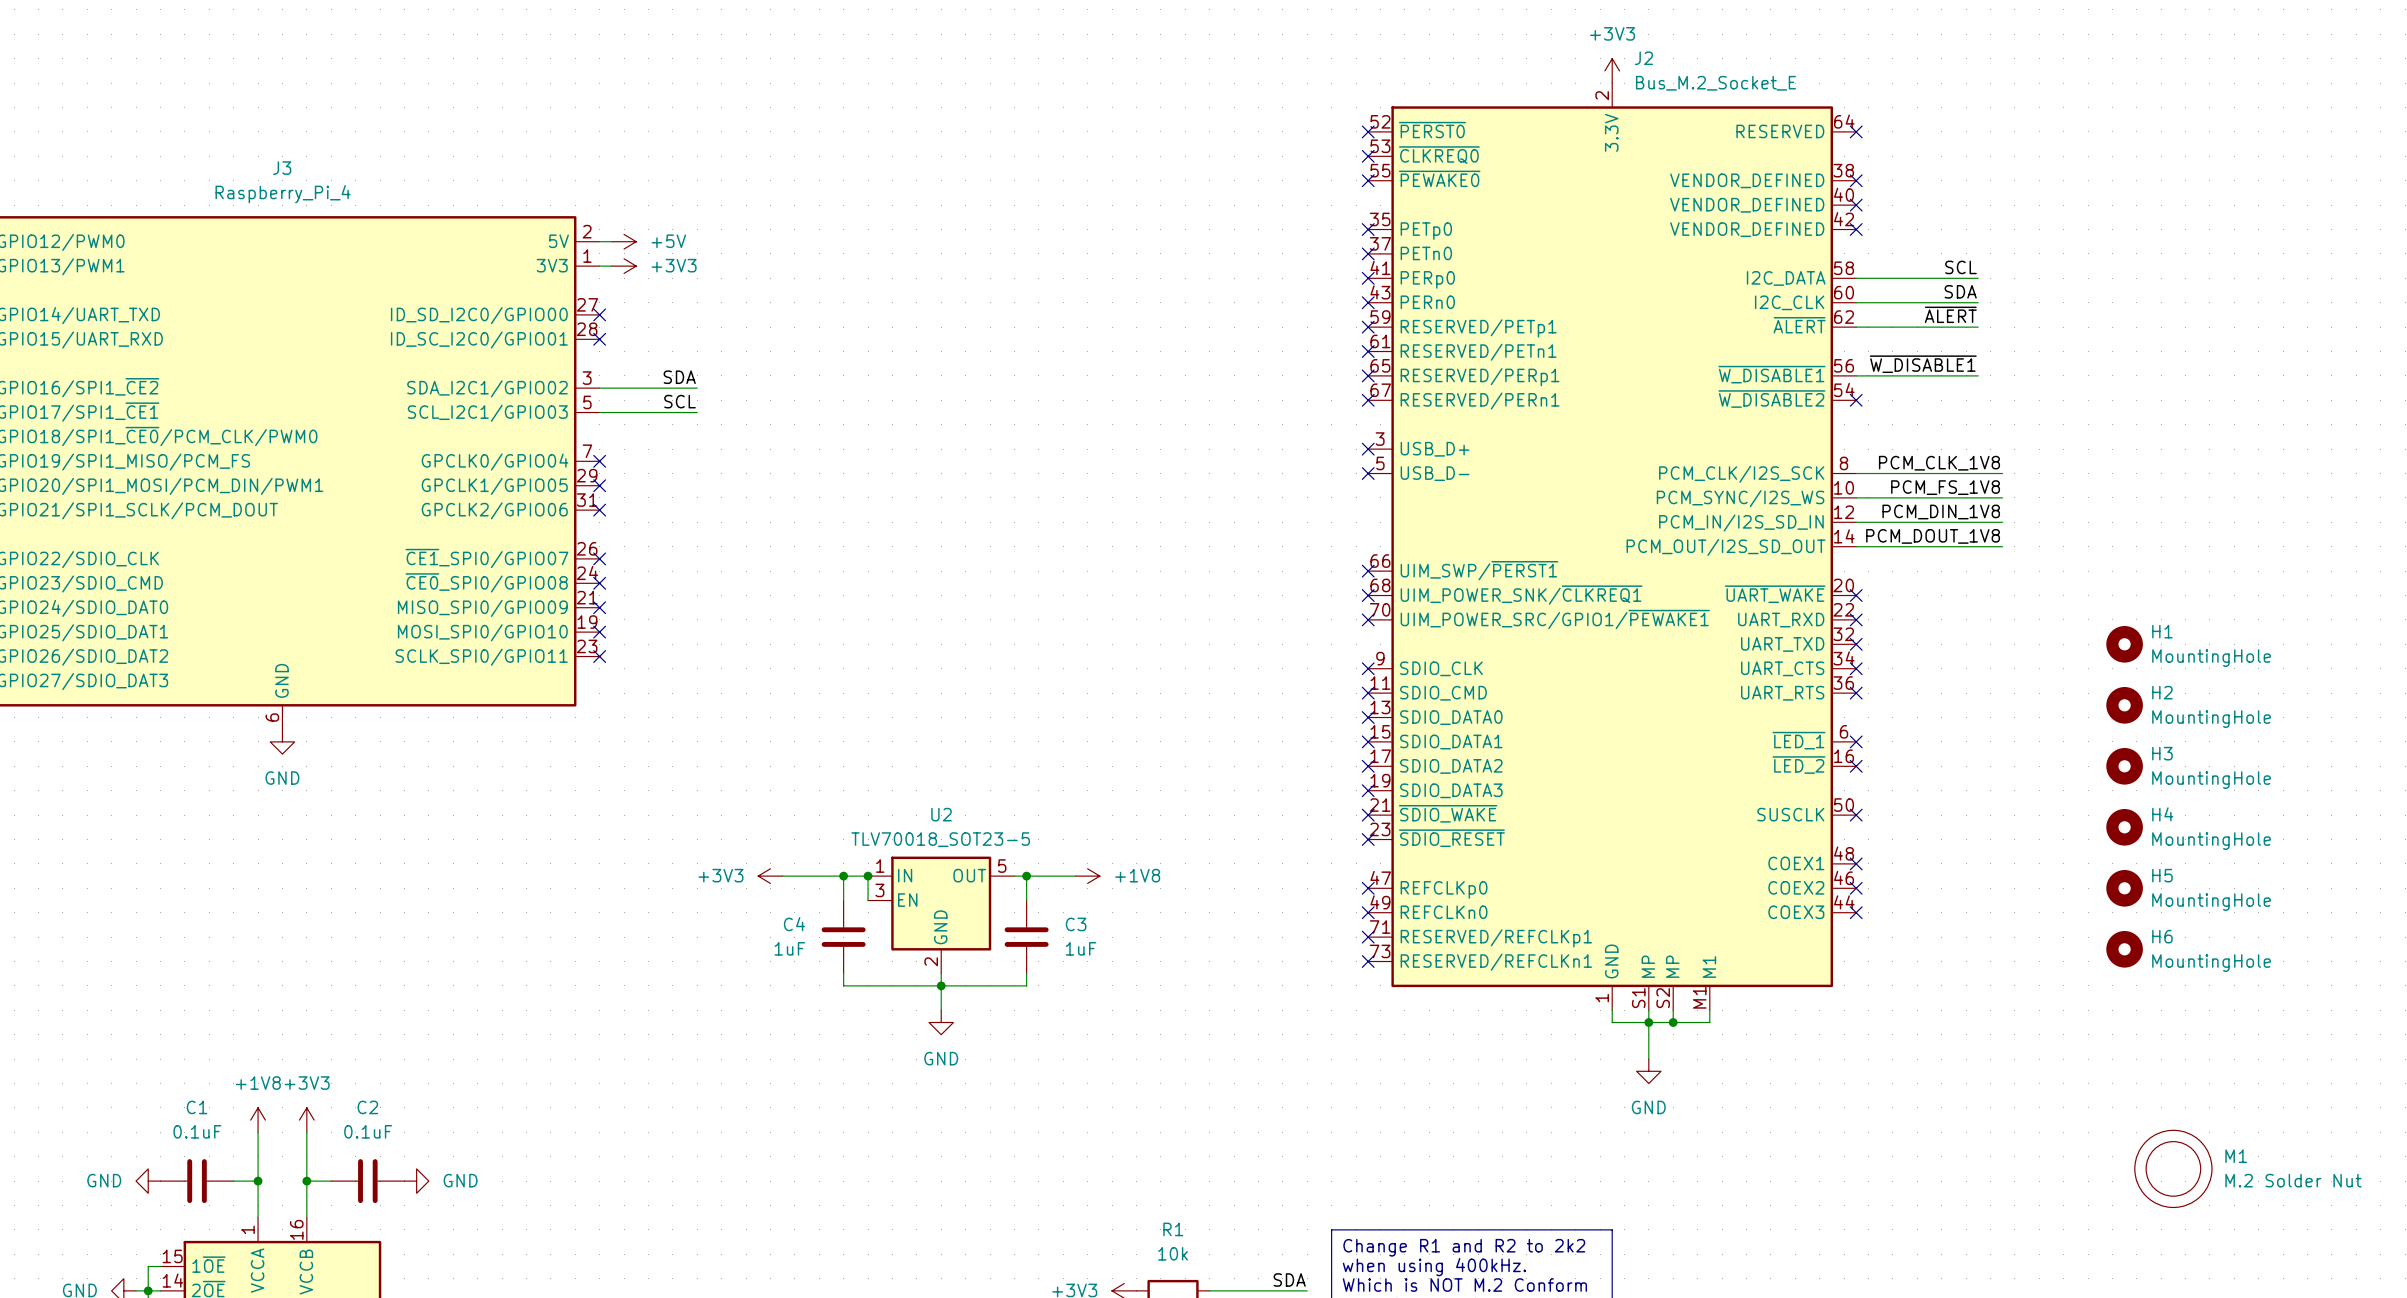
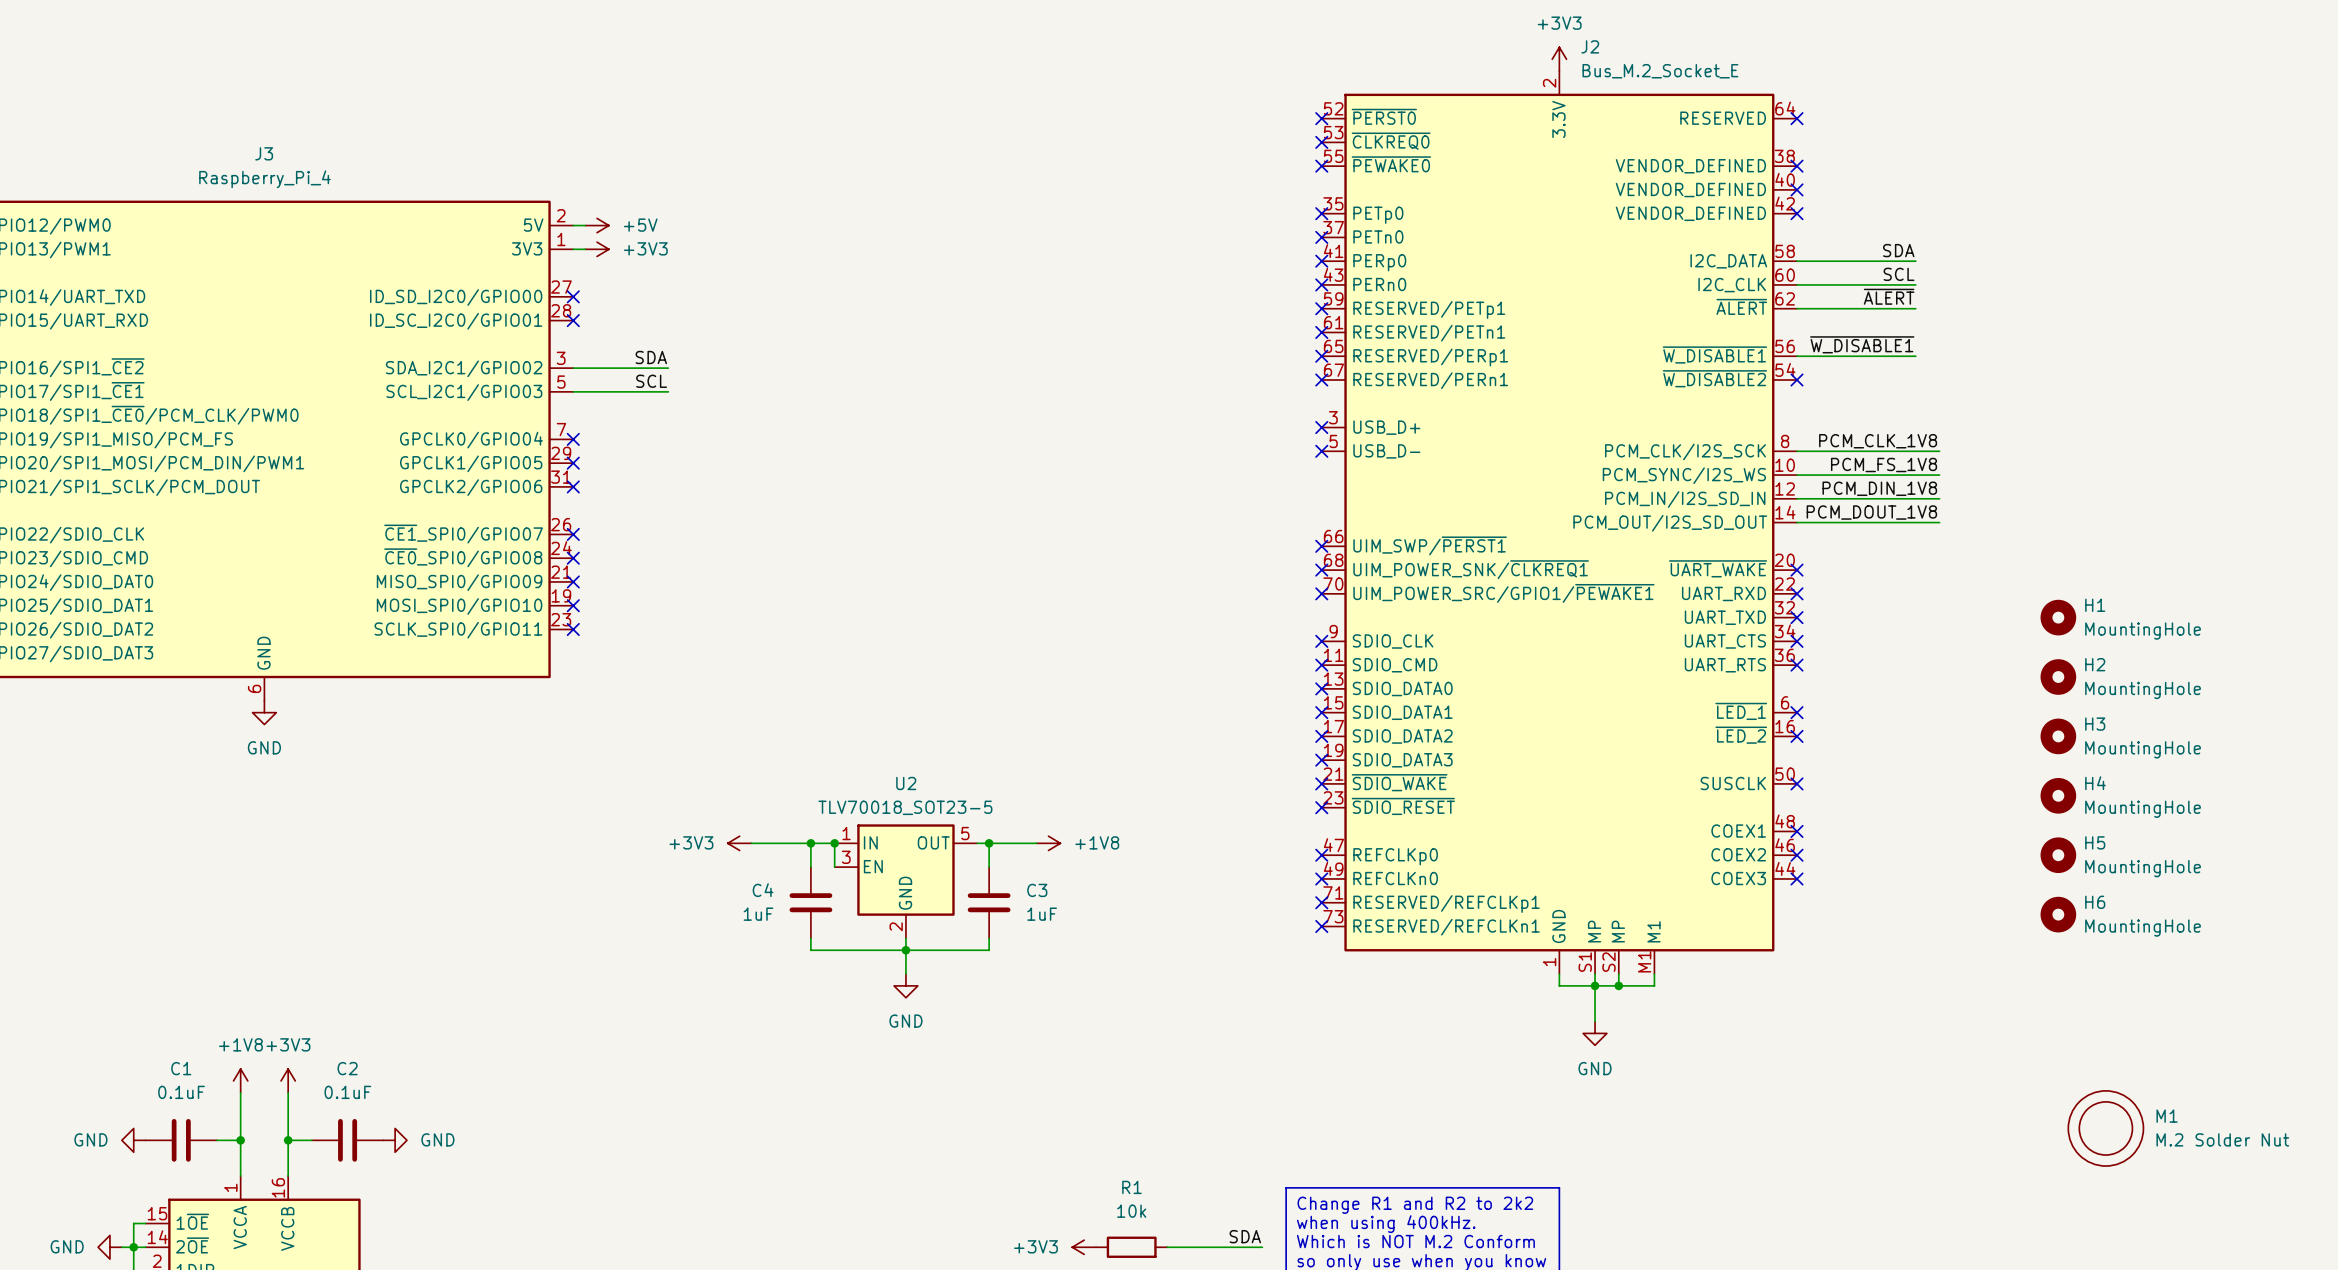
label: SCL (1960, 267) -> SDA (1898, 250)
label: SDA (1960, 291) -> SCL (1899, 274)

